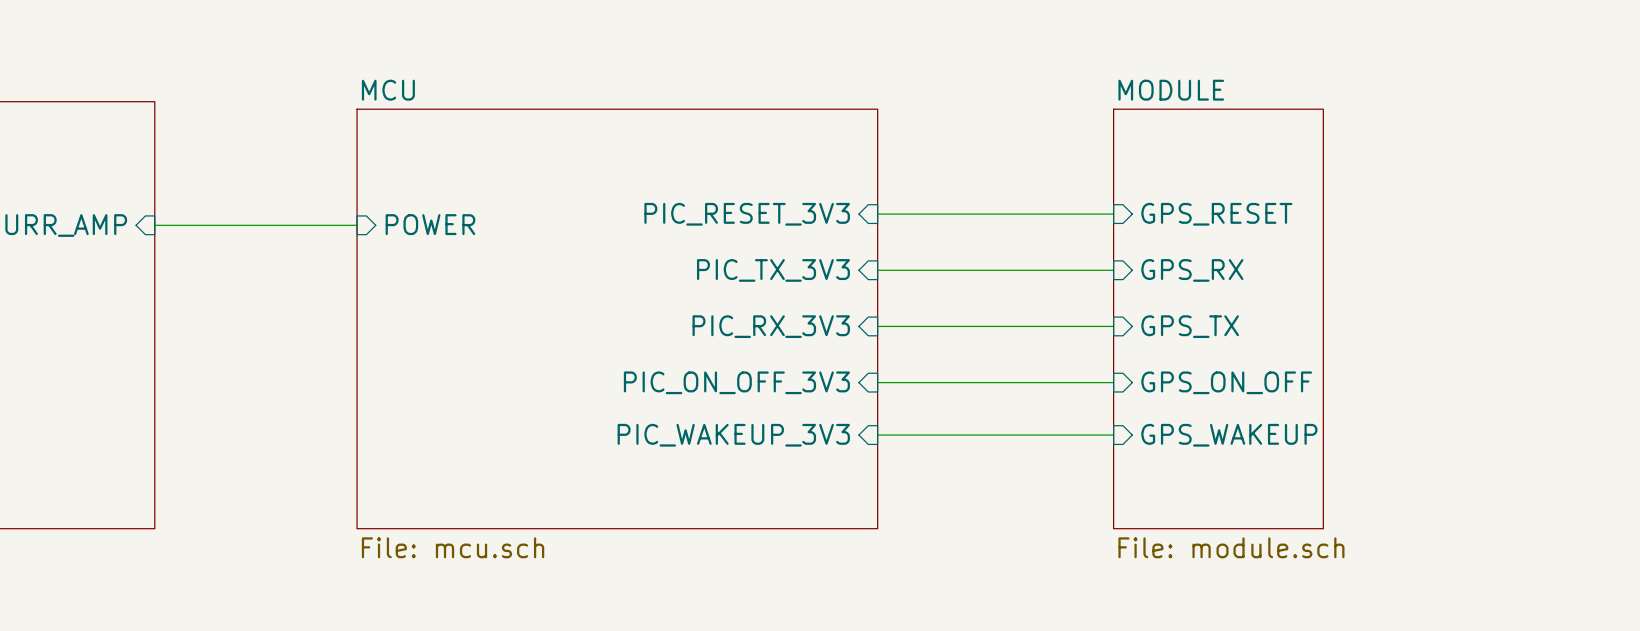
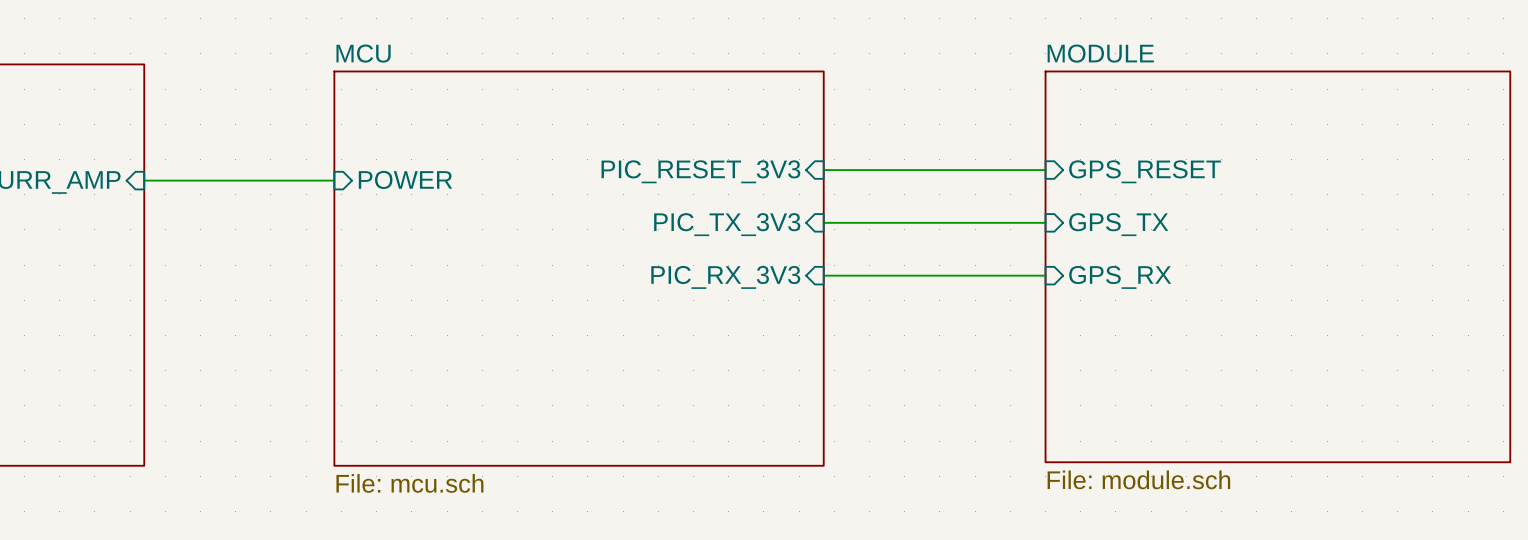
sheet pin: GPS_RX (1192, 270) -> GPS_TX (1118, 224)
sheet MODULE: none -> File: module.sch (1277, 266)
sheet MODULE: File: module.sch (1218, 318) -> none
sheet pin: GPS_TX (1190, 326) -> GPS_RX (1120, 277)
sheet pin: PIC_ON_OFF_3V3 (736, 382) -> none
wire: (877, 382) (1113, 382) -> none
sheet pin: GPS_ON_OFF (1226, 382) -> none
sheet pin: PIC_WAKEUP_3V3 (733, 435) -> none
wire: (877, 435) (1113, 435) -> none
sheet pin: GPS_WAKEUP (1229, 435) -> none

